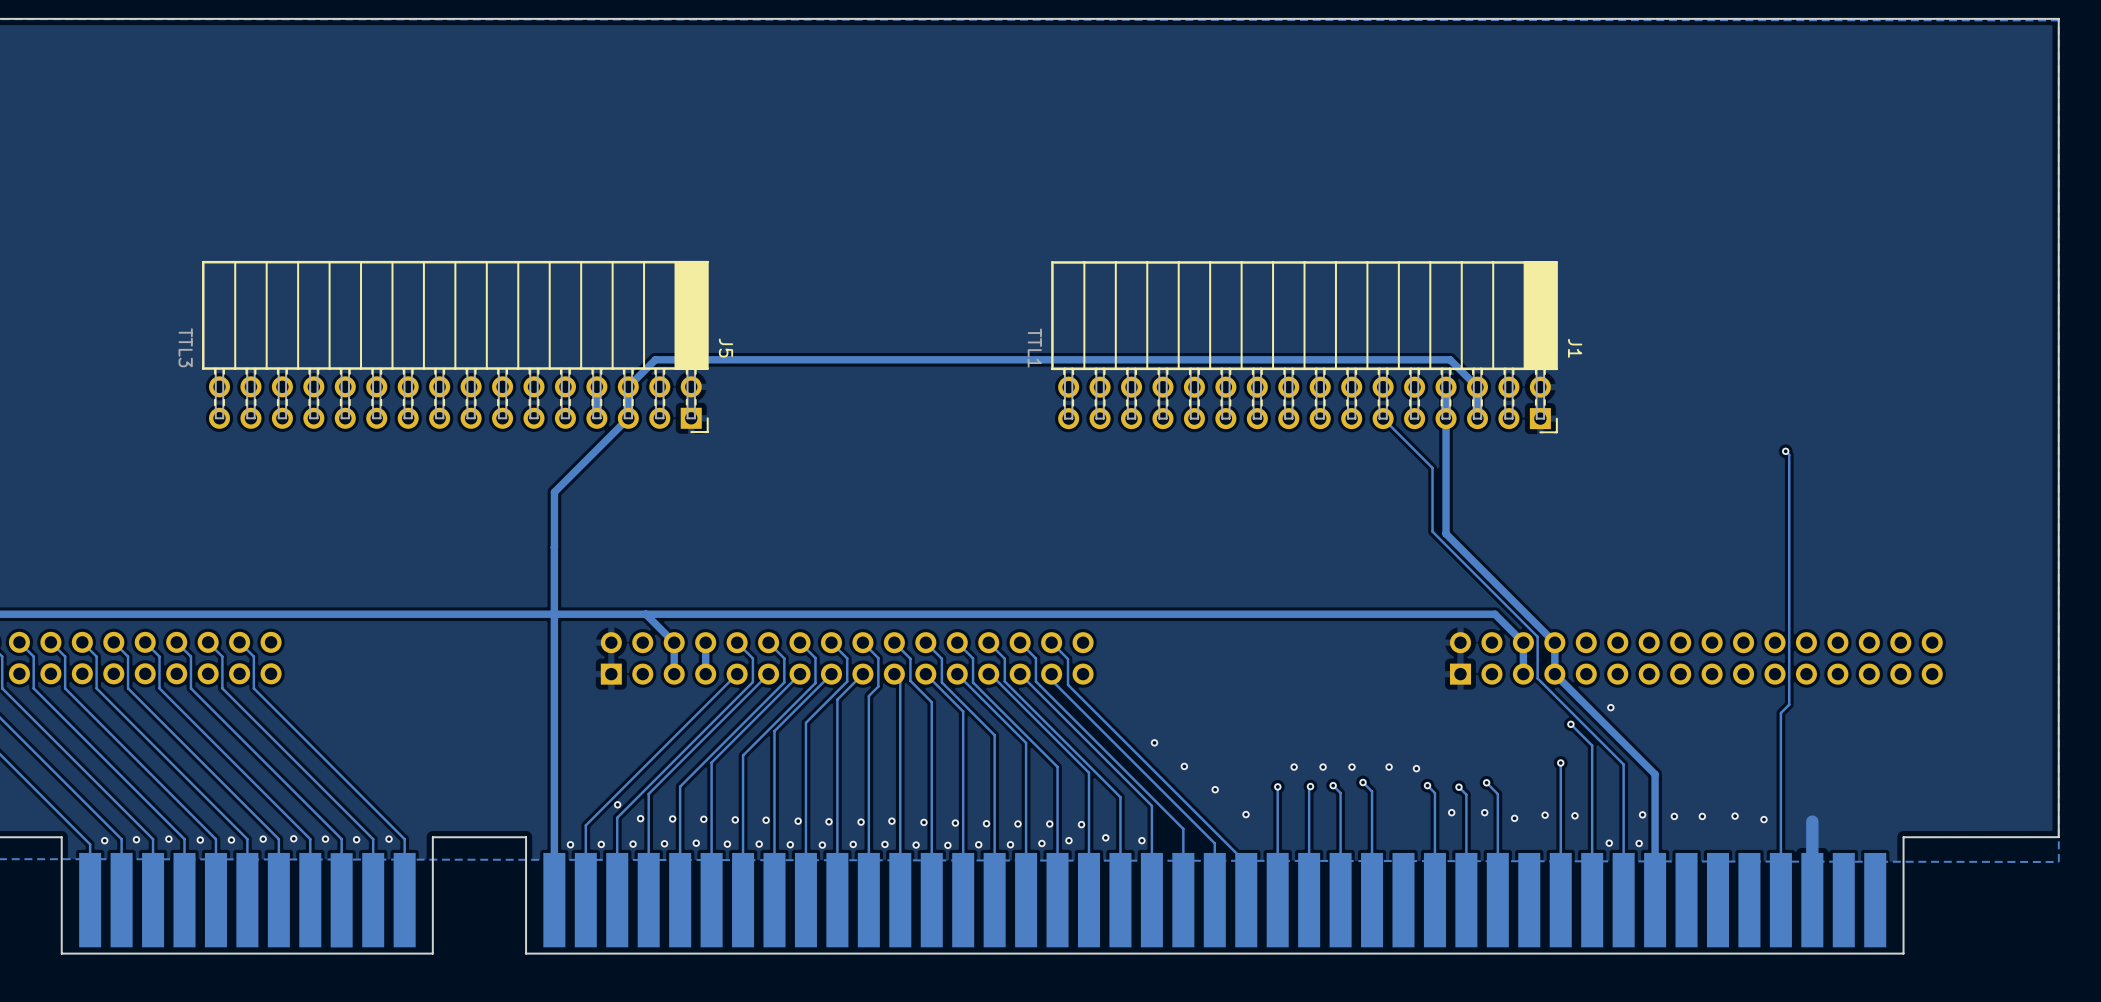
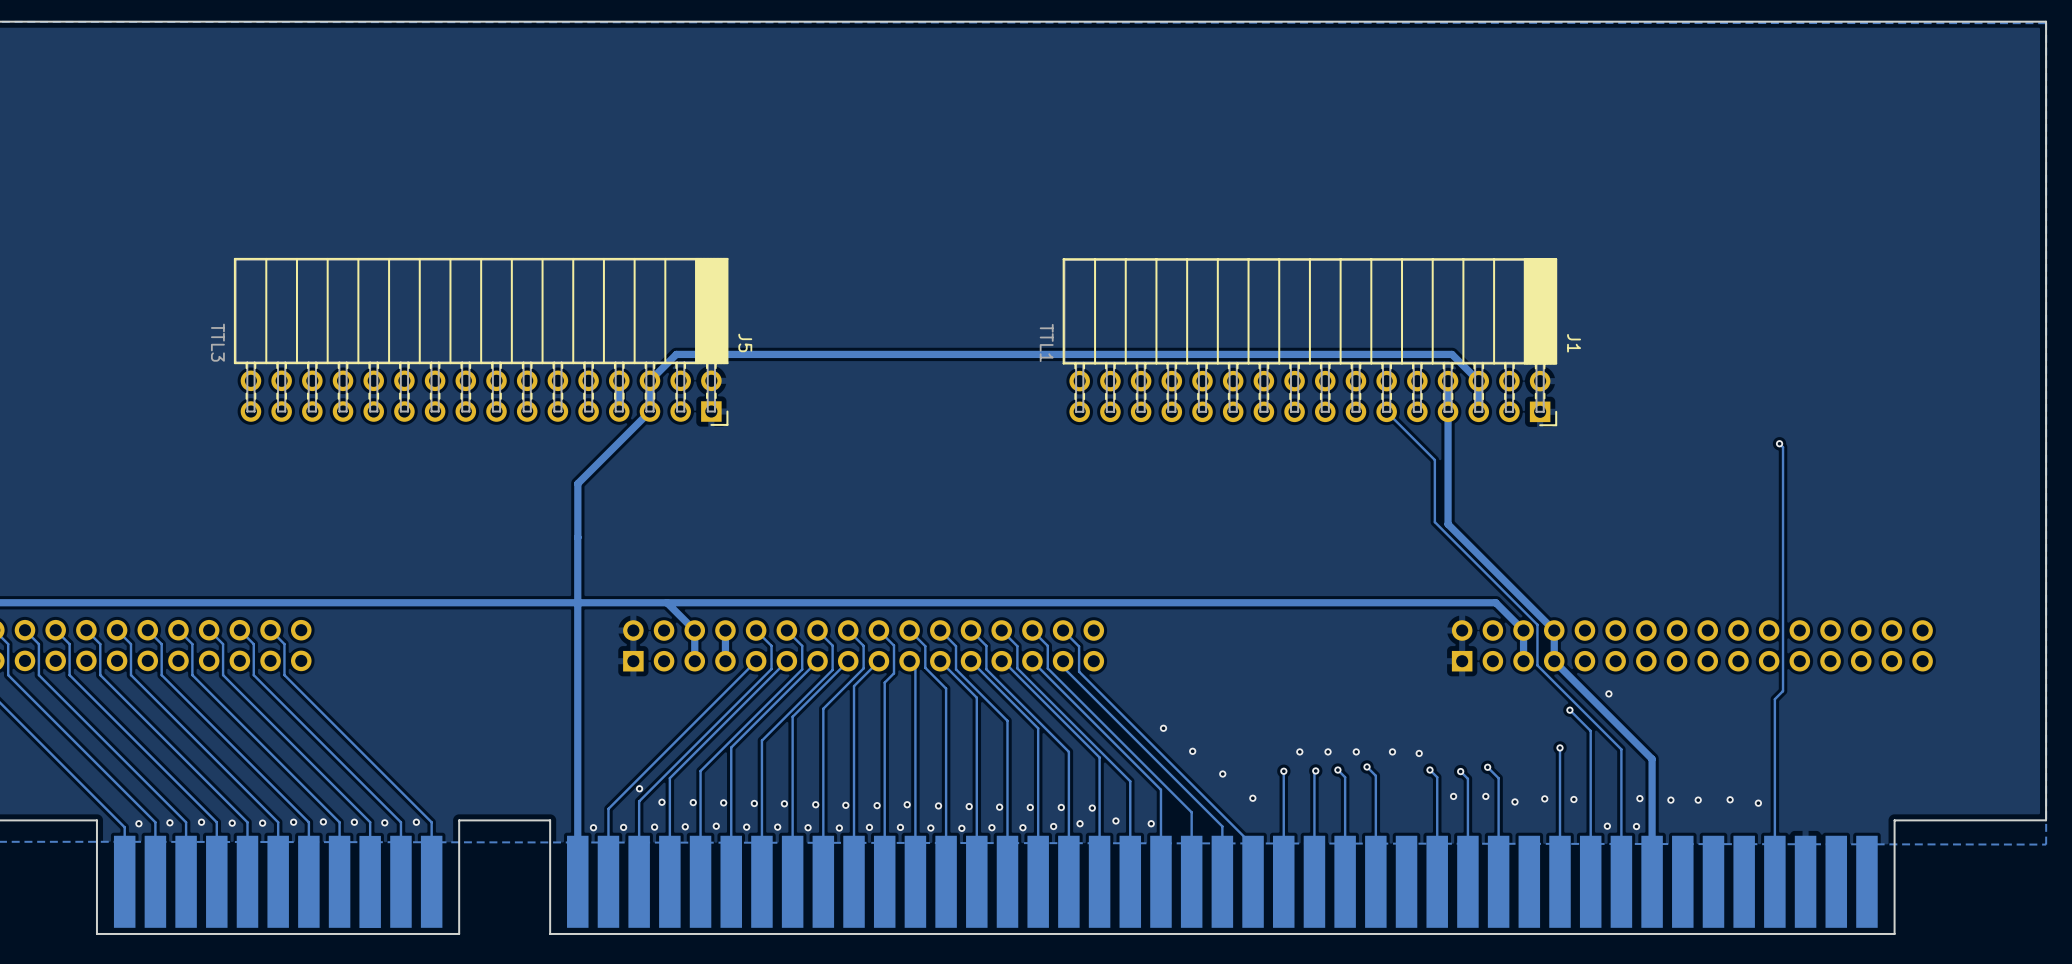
track: (1812, 821) (1812, 900) -> none

